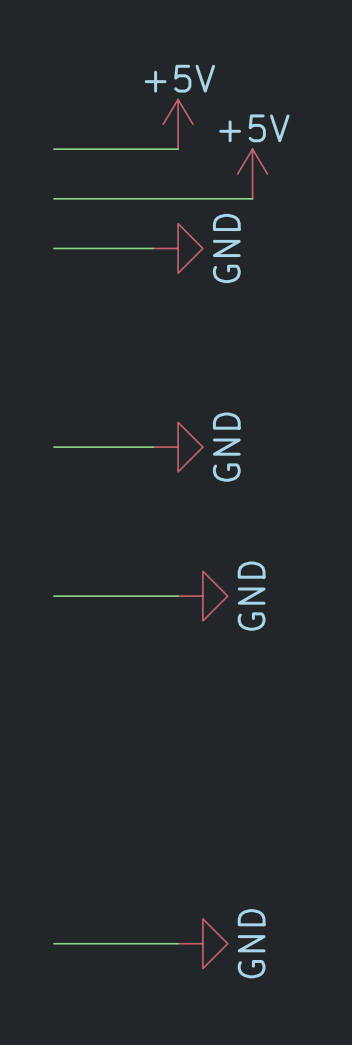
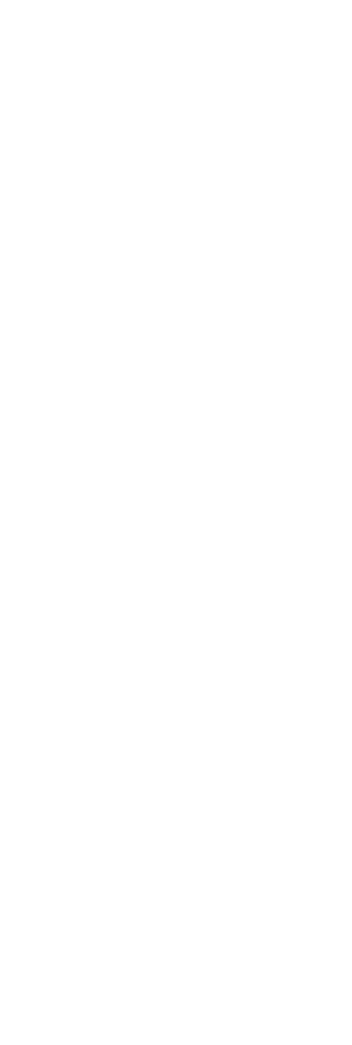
power symbol: +5V (178, 124) -> none
wire: (53, 149) (178, 149) -> none
power symbol: +5V (252, 173) -> none
wire: (53, 198) (252, 198) -> none
wire: (53, 248) (153, 248) -> none
power symbol: GND (178, 248) -> none
wire: (53, 447) (153, 447) -> none
power symbol: GND (178, 447) -> none
wire: (53, 596) (178, 596) -> none
power symbol: GND (202, 596) -> none
wire: (53, 943) (178, 943) -> none
power symbol: GND (202, 943) -> none

